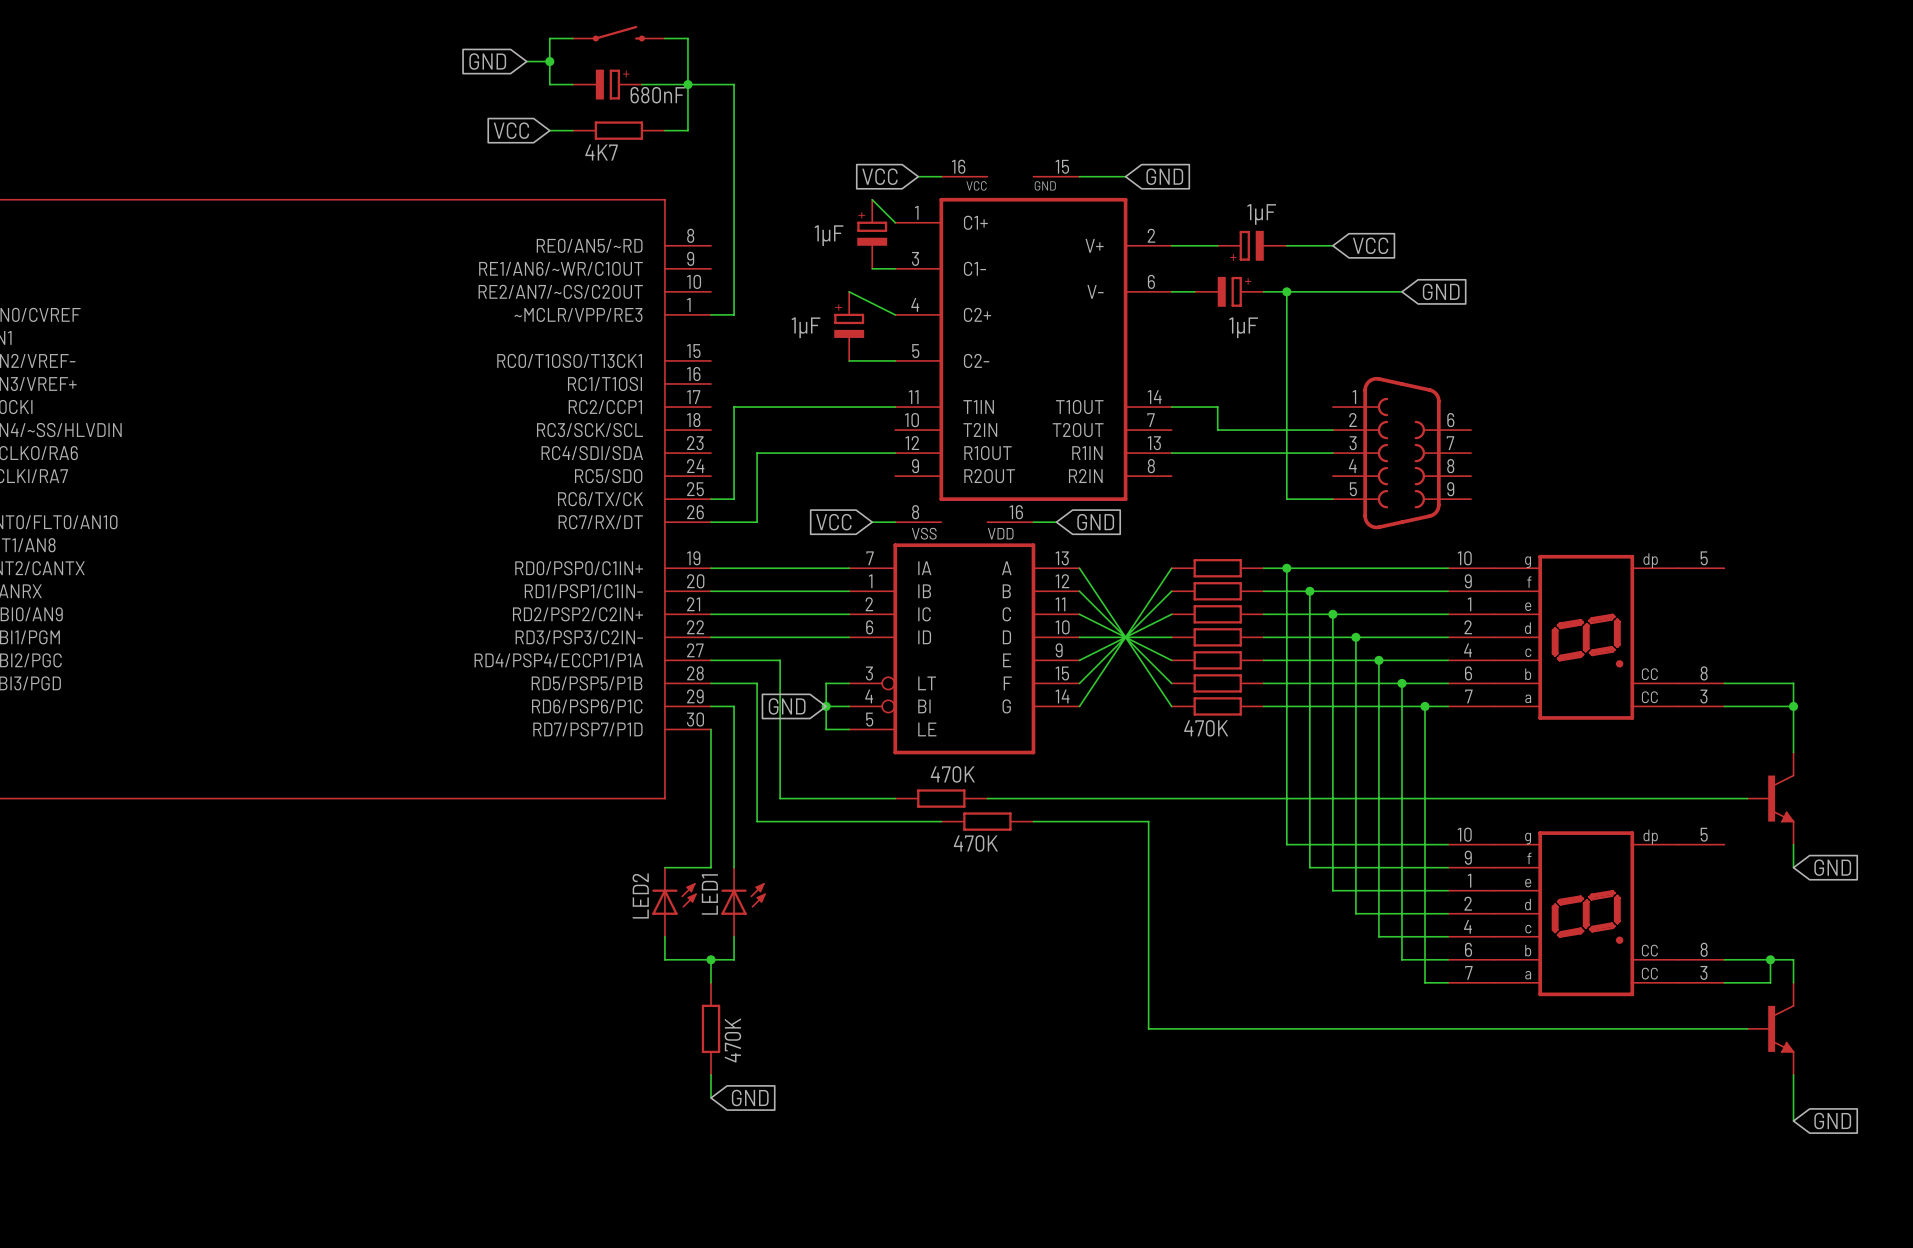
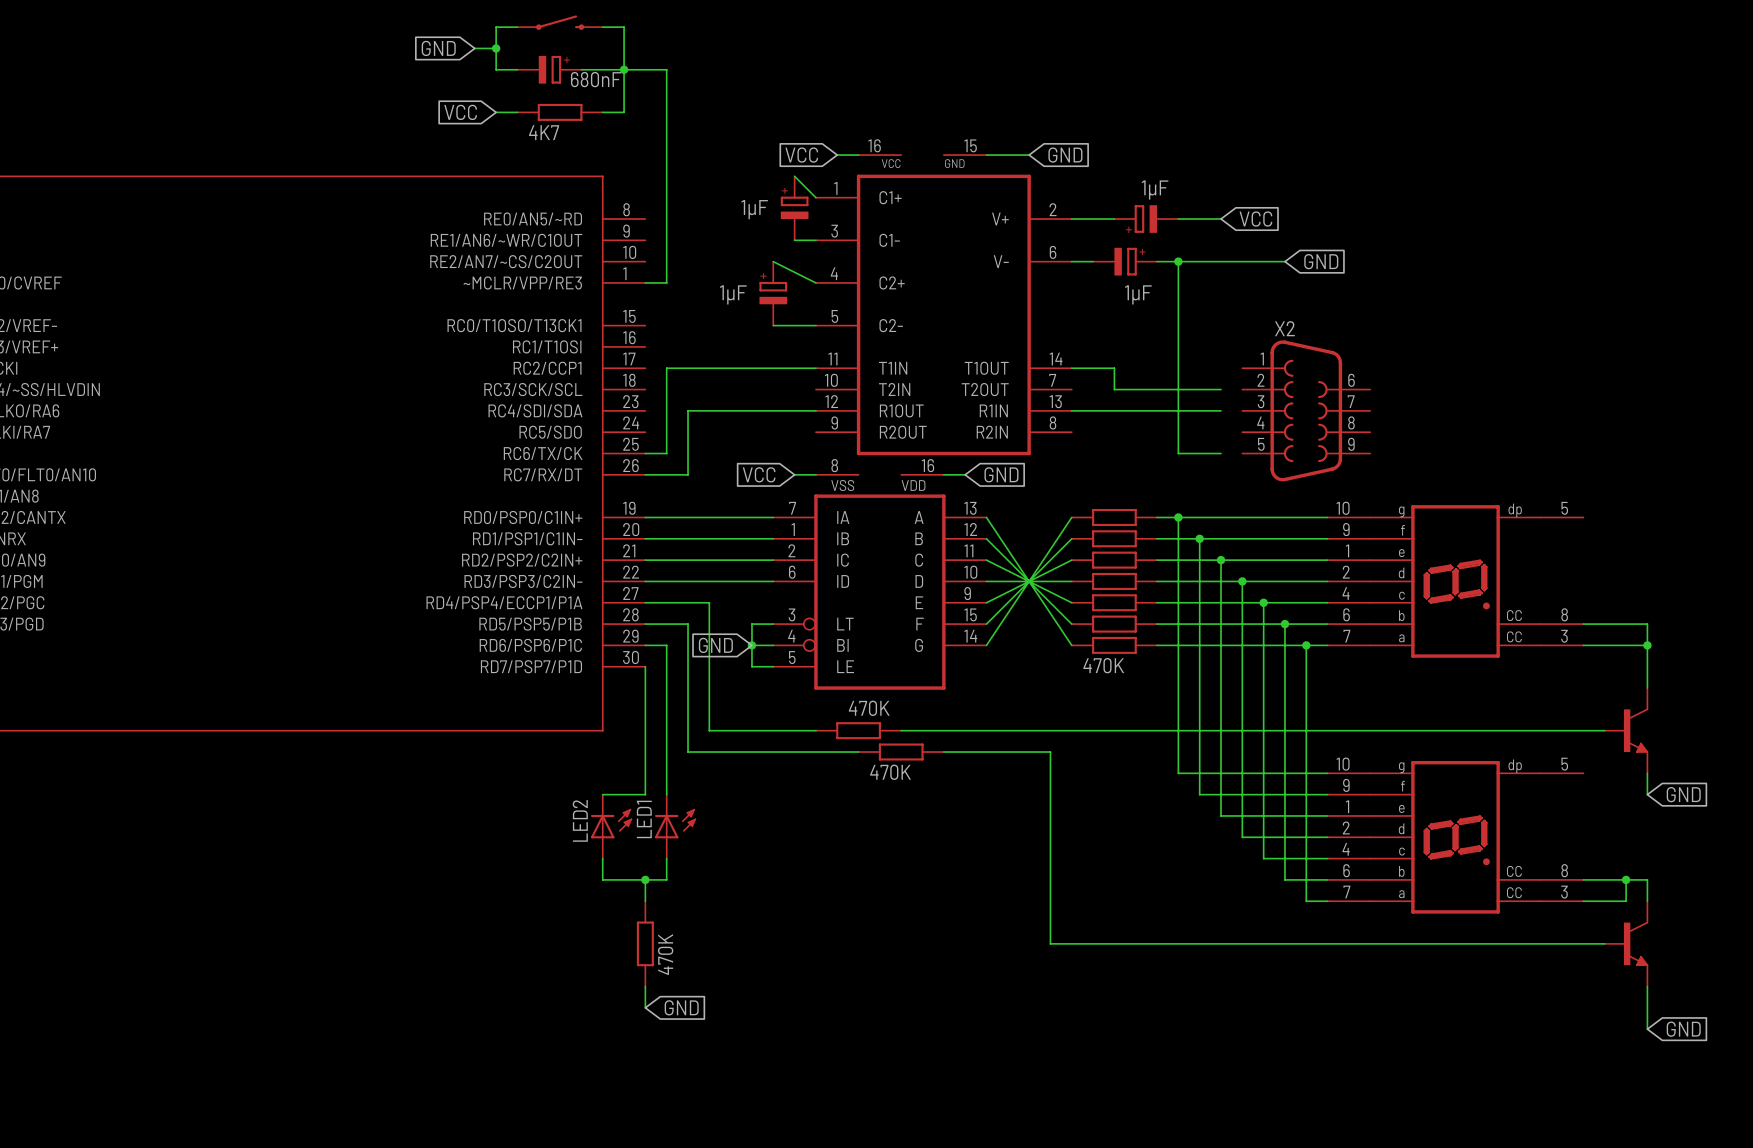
part: (1401, 453) -> none
X2: none -> (1306, 410)

